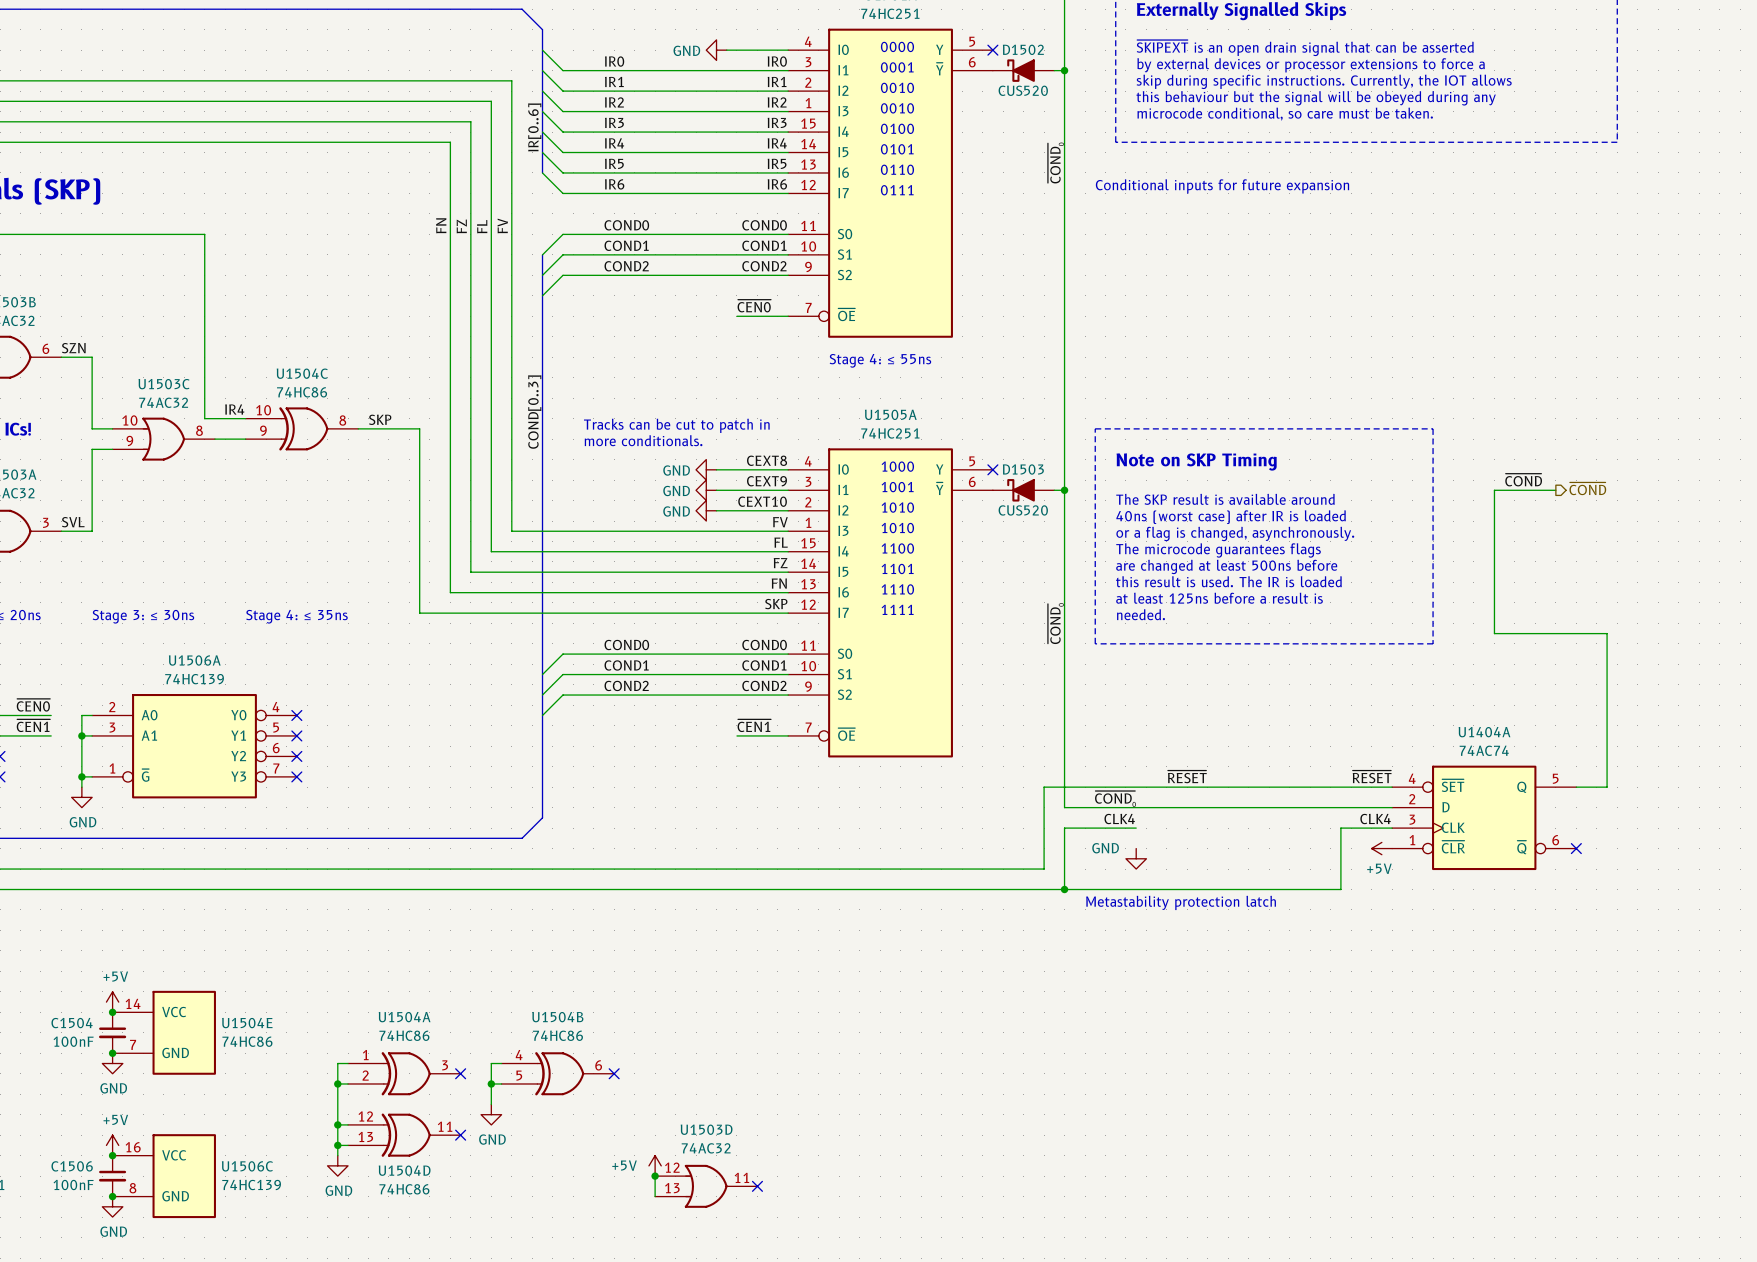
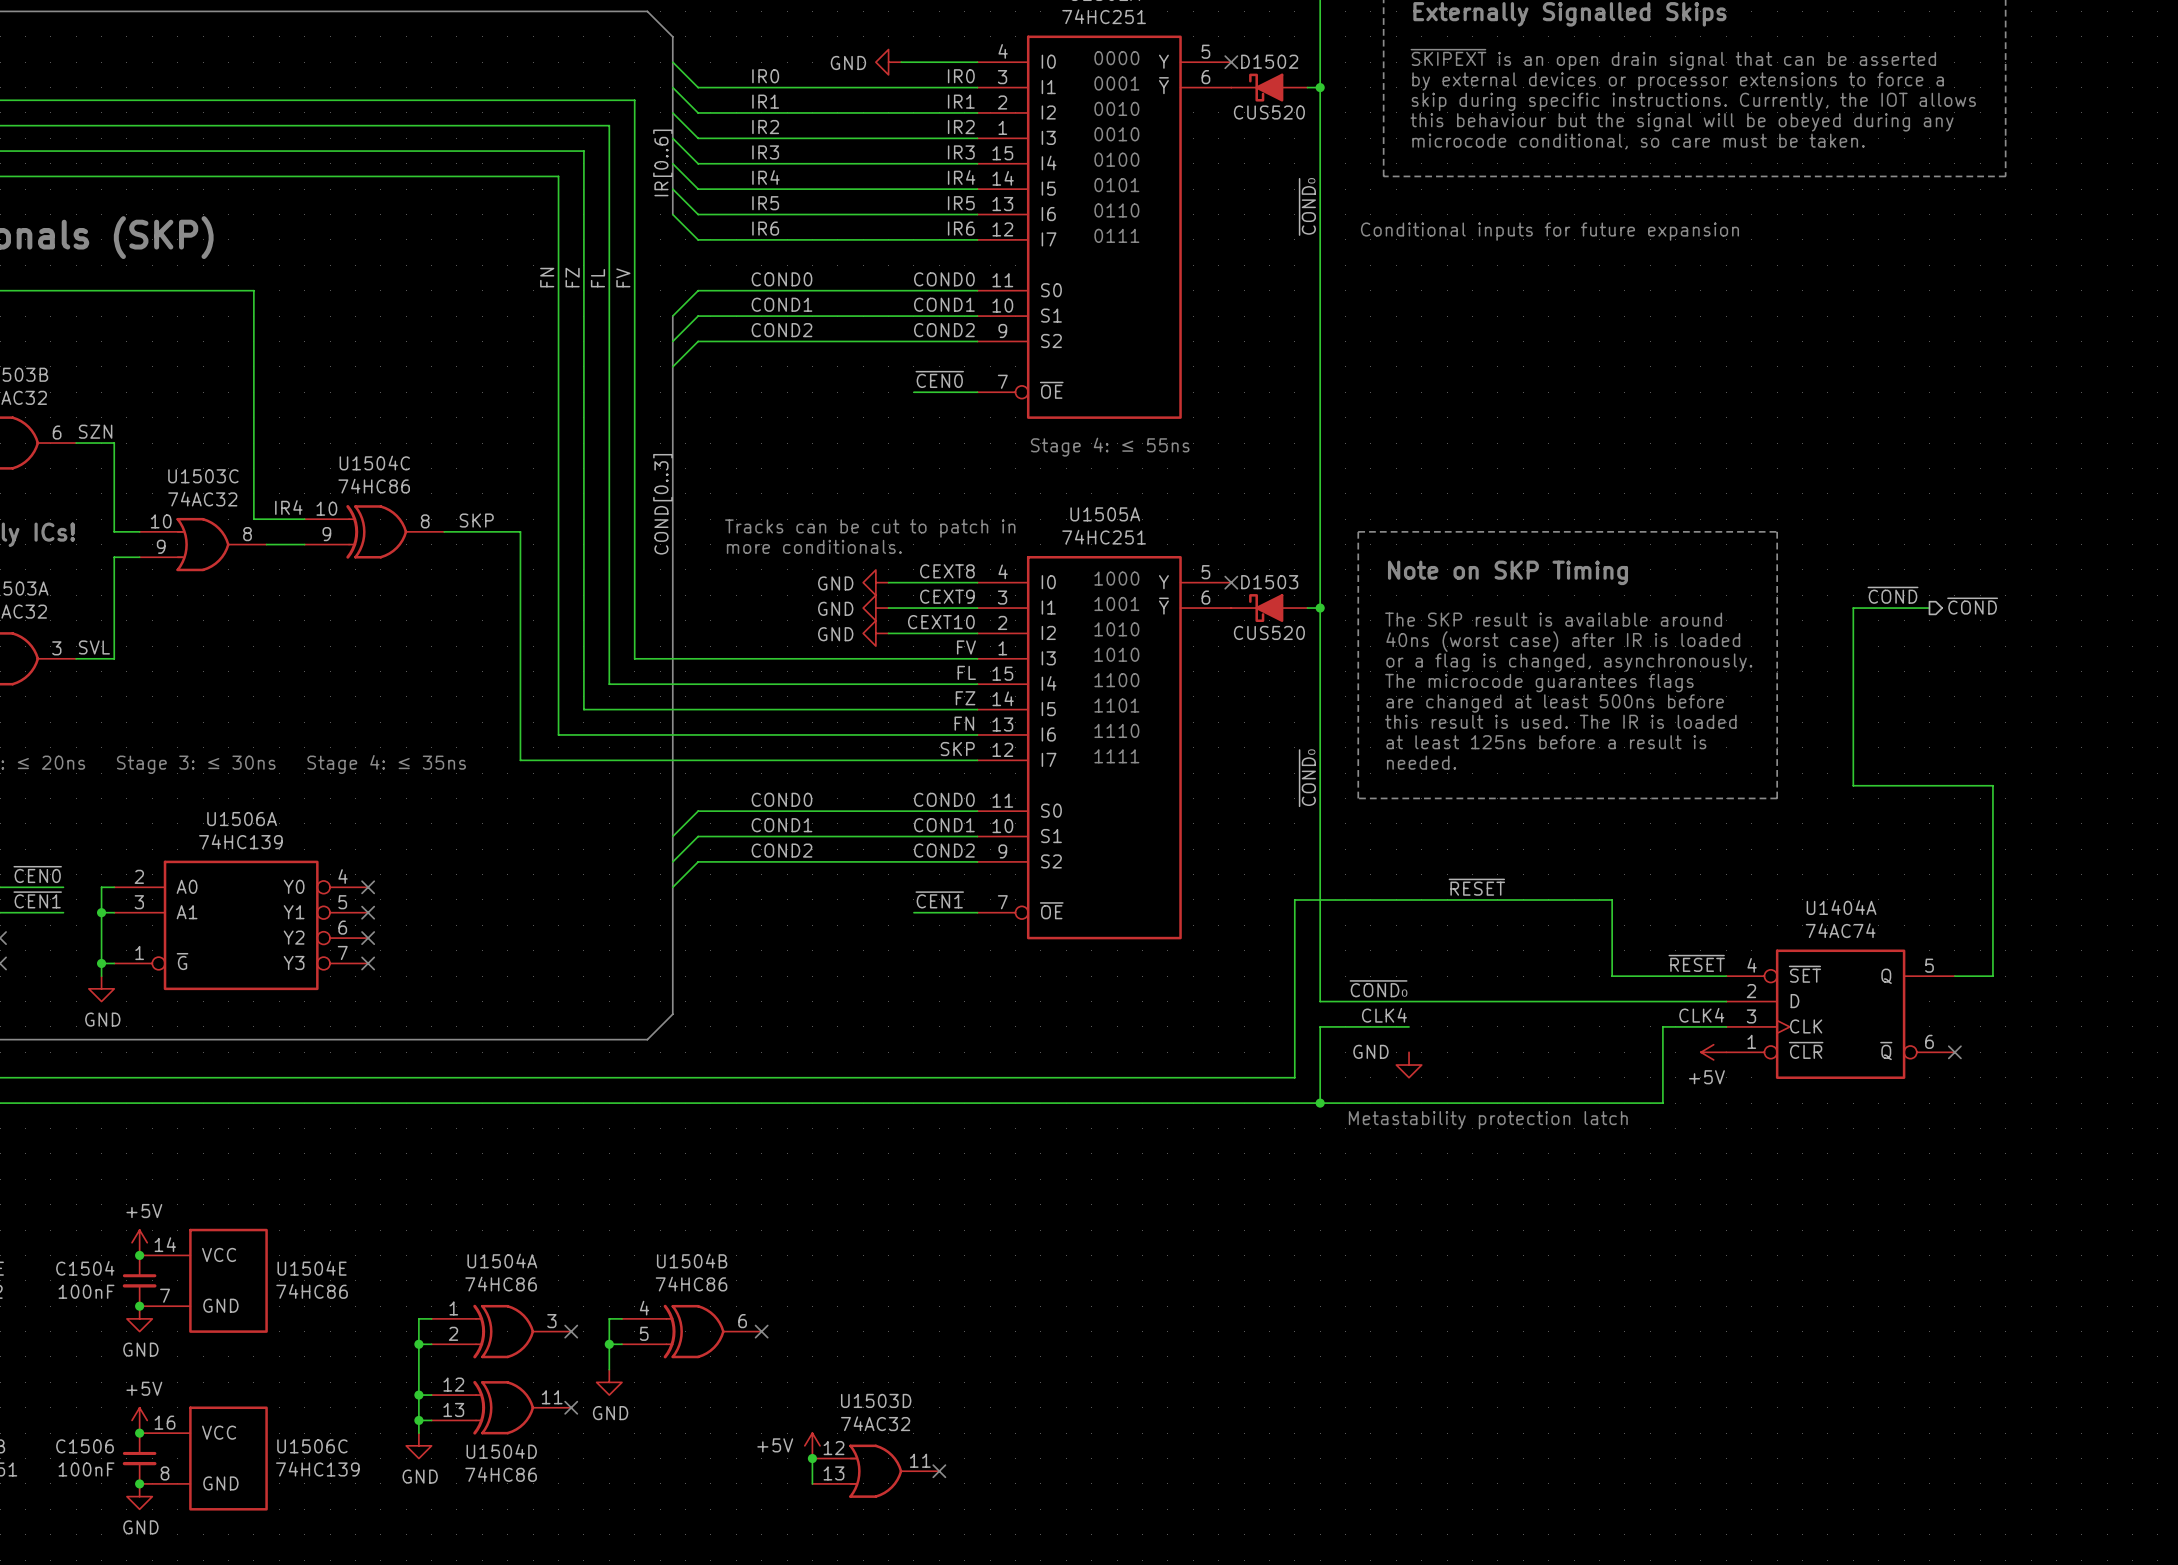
label position: ~{RESET} (1187, 776) -> ~{RESET} (1476, 887)
wire: (1044, 787) (1299, 787) -> (1294, 976) (1294, 899) (1612, 899) (1612, 976)

